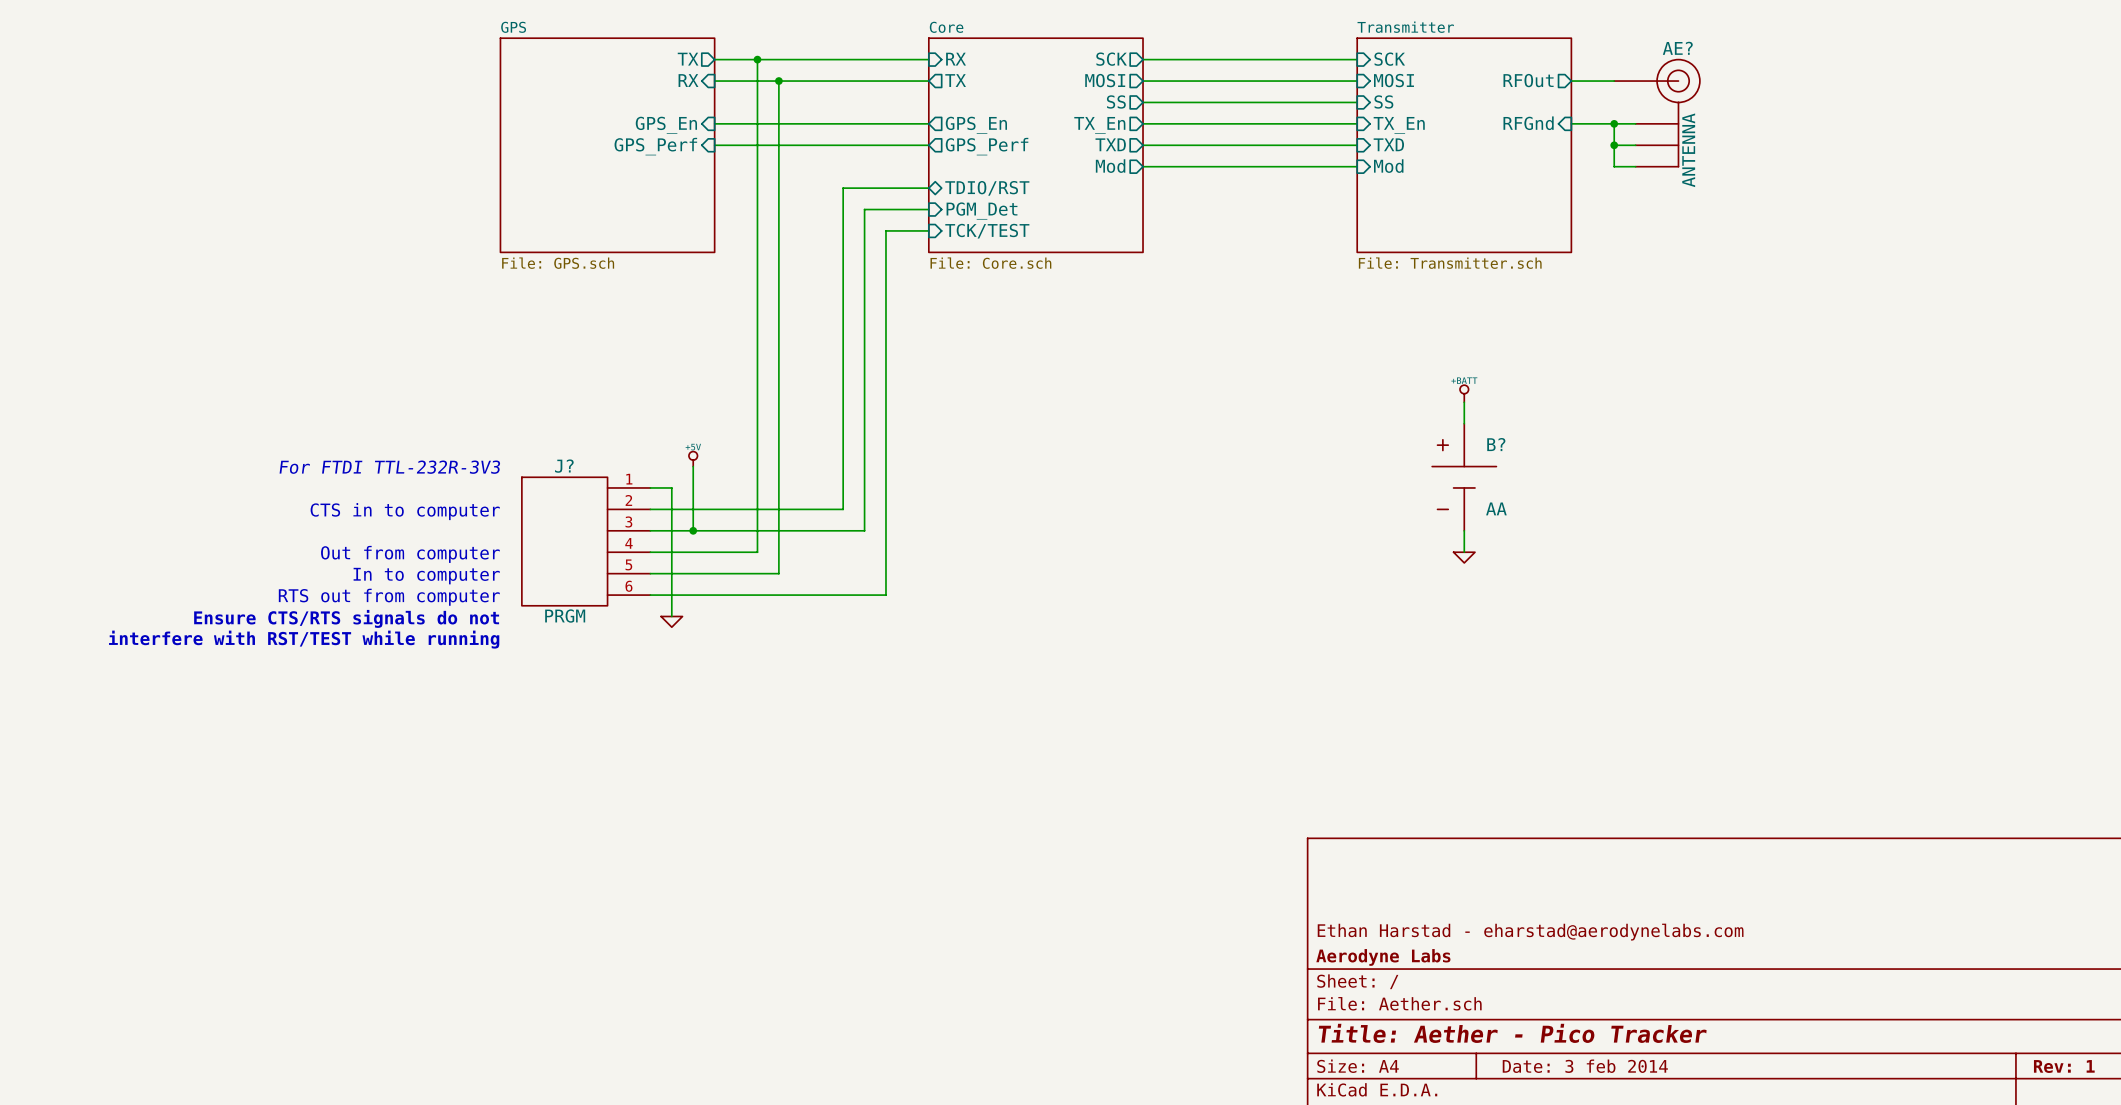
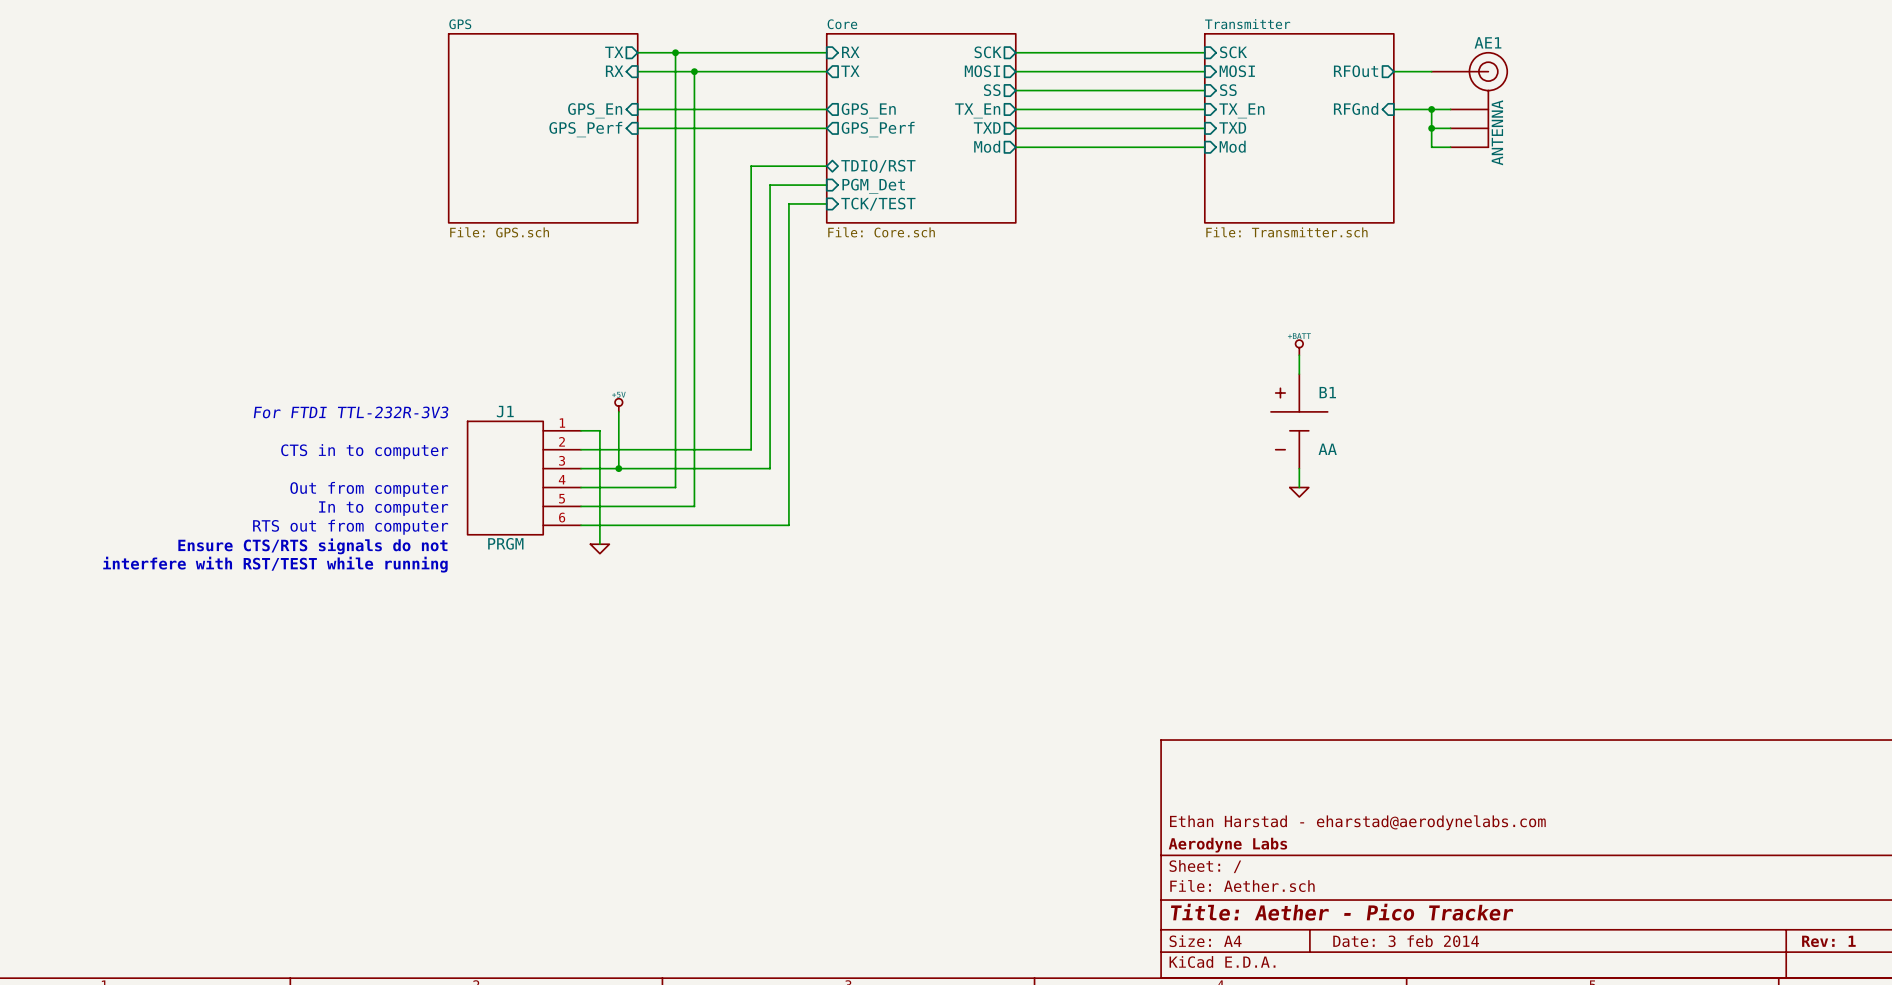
AE? name: AE? (1677, 48) -> AE1 (1487, 42)
B? name: B? (1496, 444) -> B1 (1327, 392)
J? name: J? (564, 466) -> J1 (505, 411)

